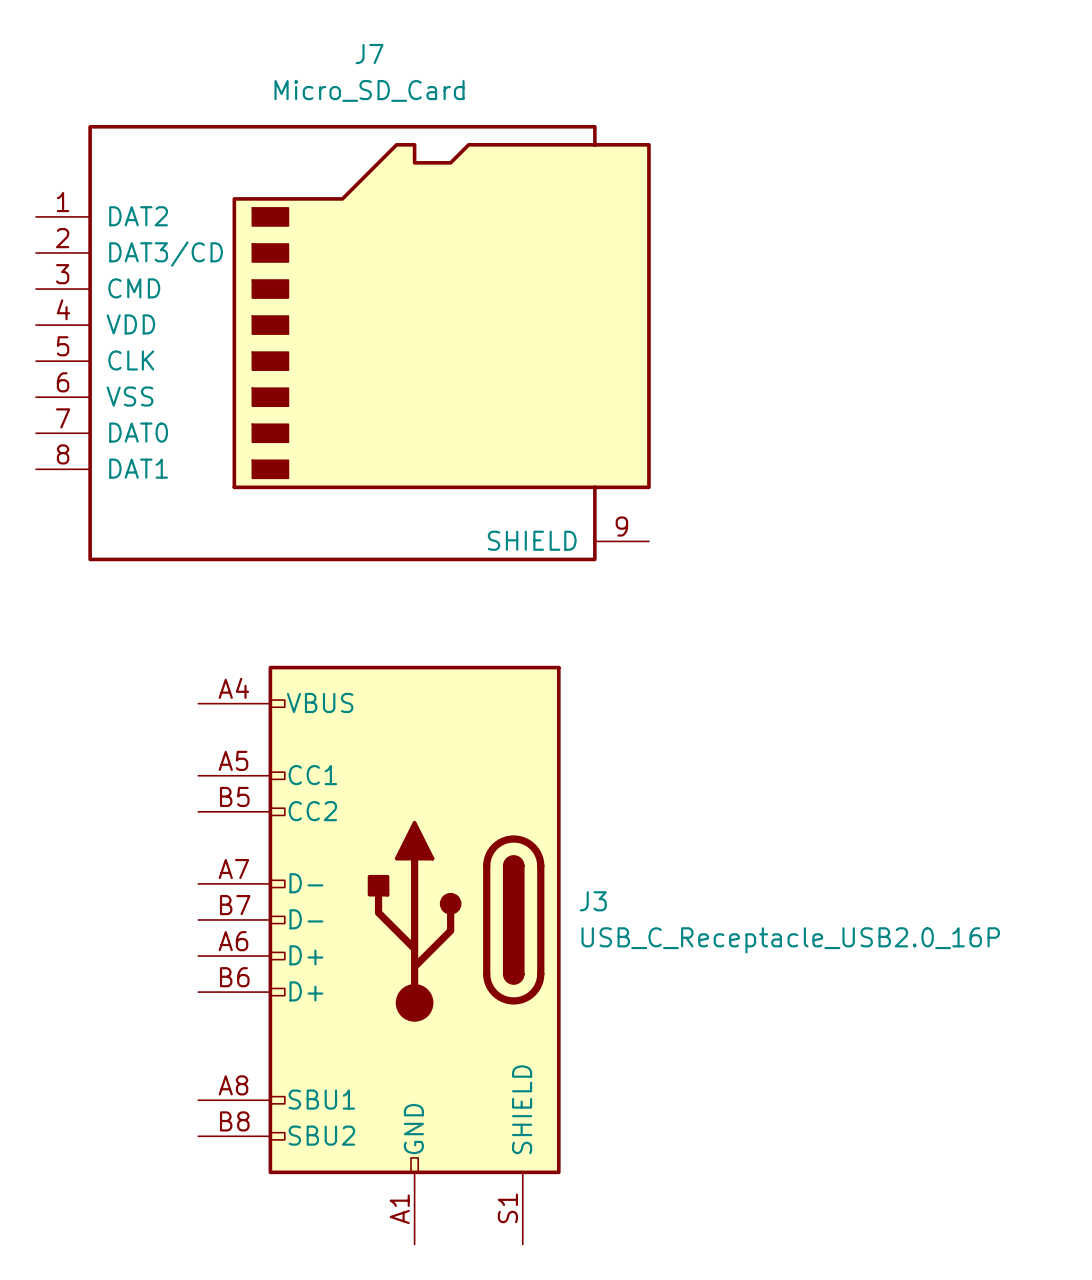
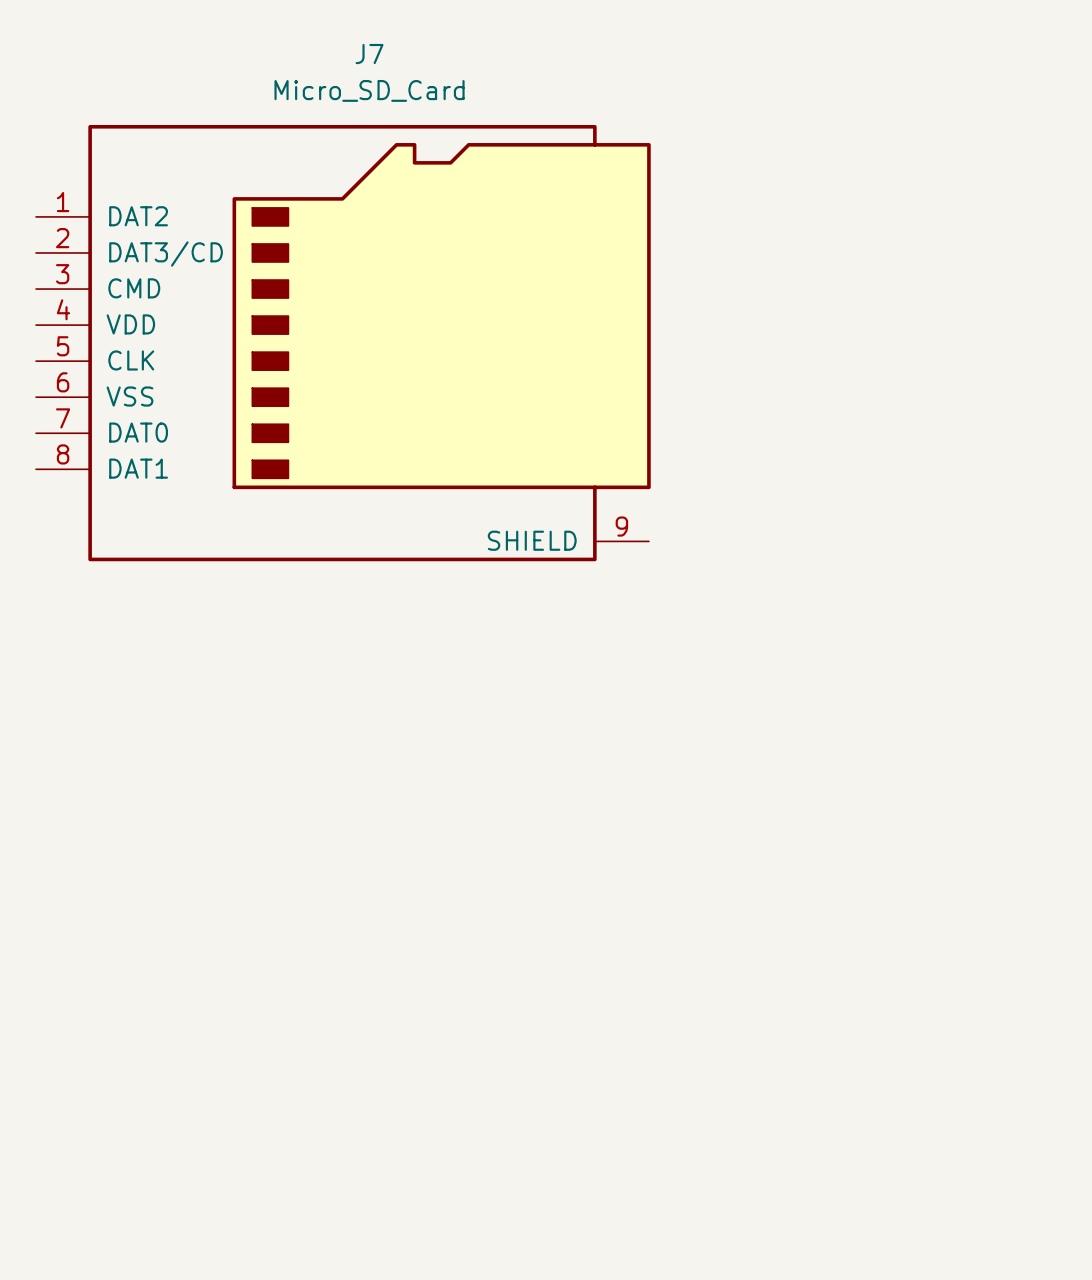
J3: USB_C_Receptacle_USB2.0_16P (379, 955) -> none

